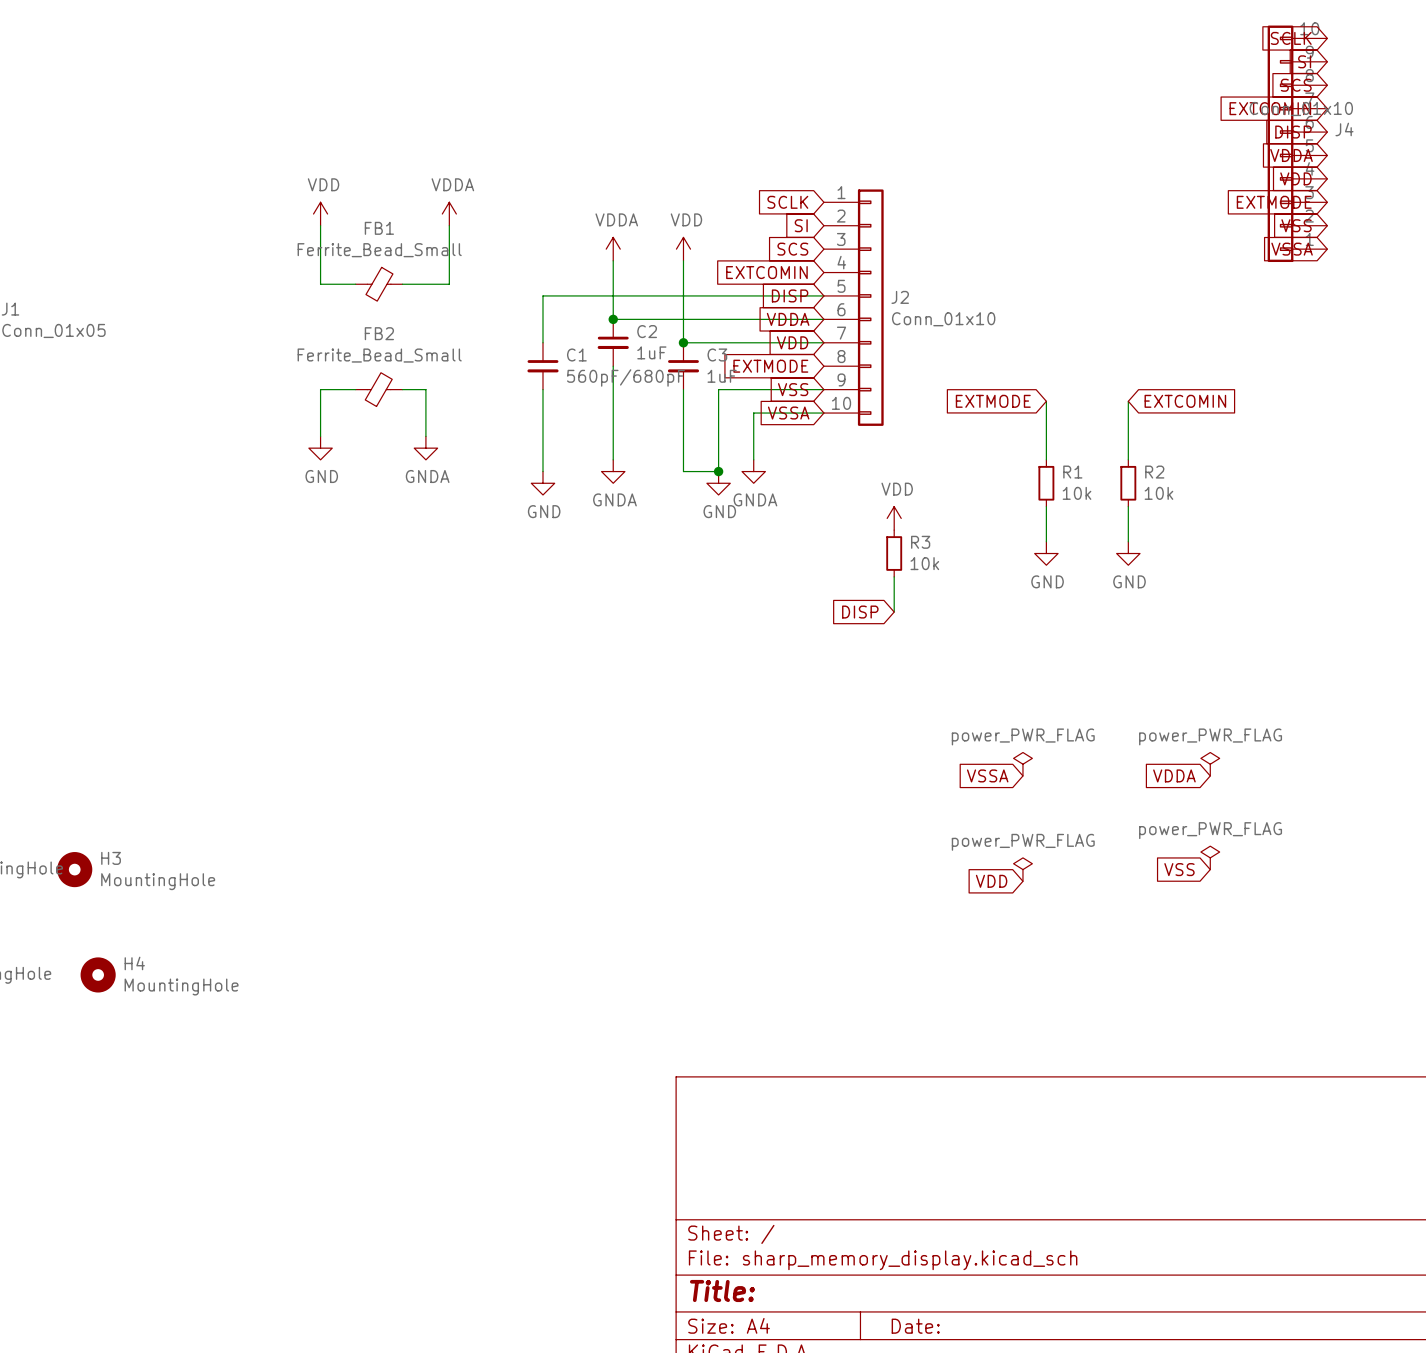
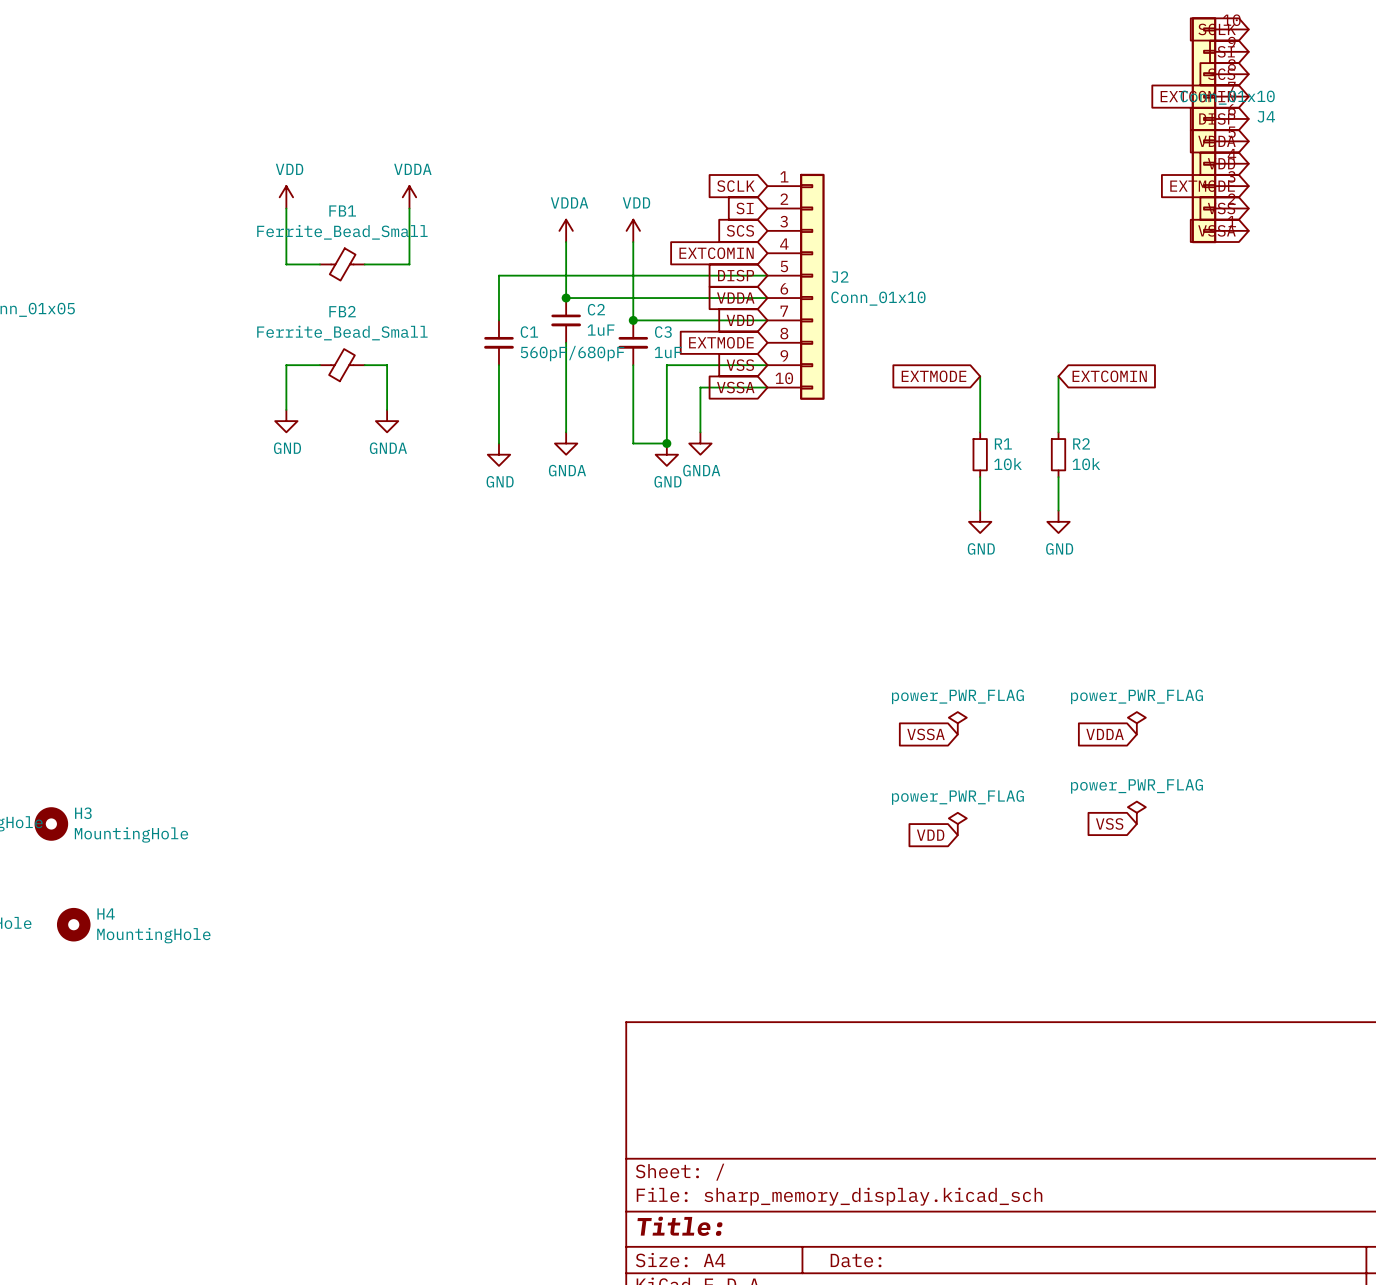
power symbol: VDD (894, 518) -> none
R3: 10k (894, 553) -> none
wire: (894, 576) (894, 612) -> none
global label: DISP (860, 612) -> none

